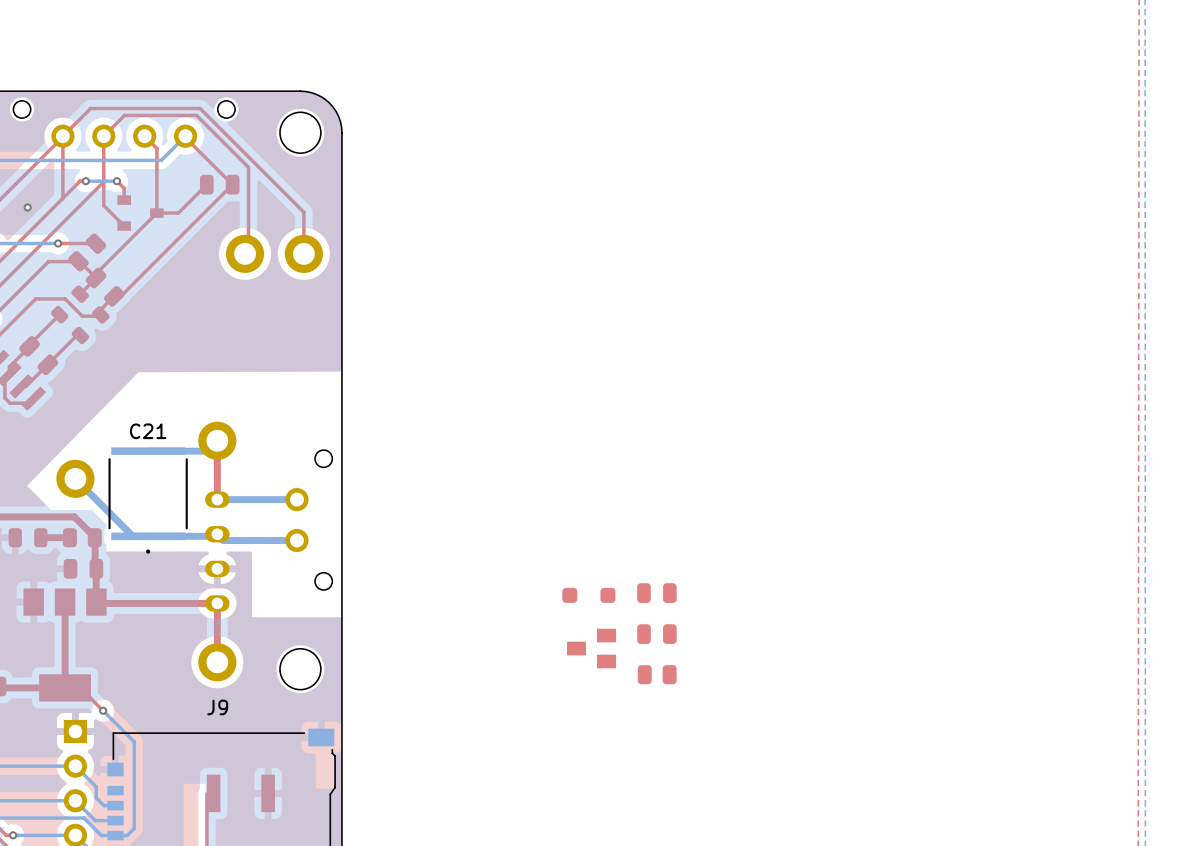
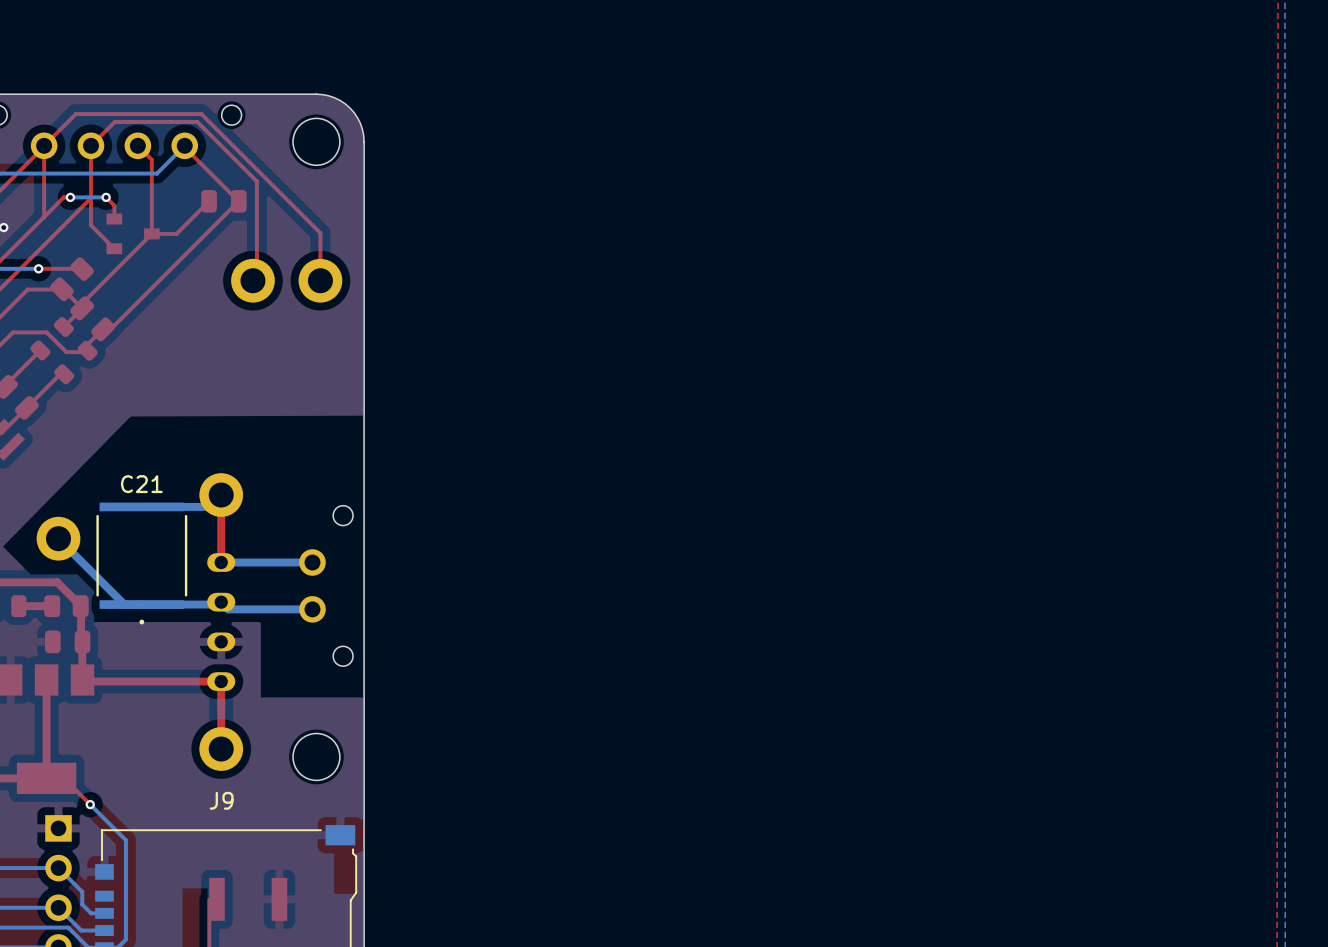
part: (656, 593) -> none
part: (588, 595) -> none
part: (656, 634) -> none
part: (591, 648) -> none
part: (657, 674) -> none

